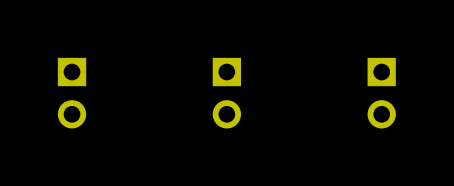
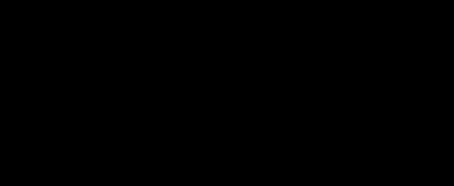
part: (72, 93) -> none
part: (226, 93) -> none
part: (381, 93) -> none

